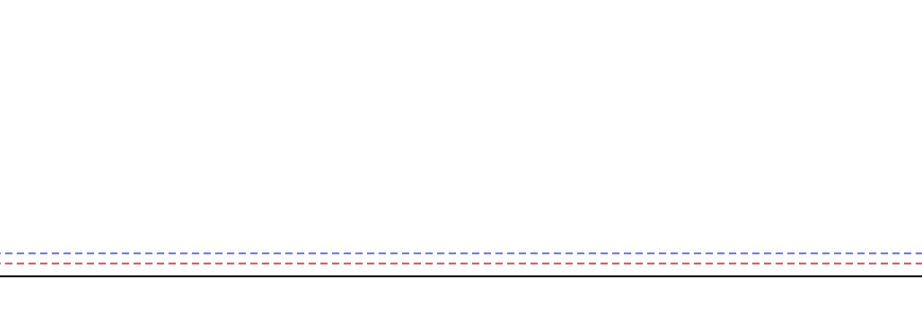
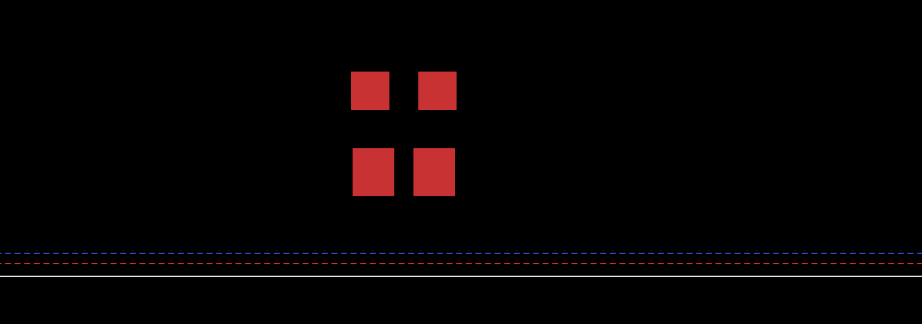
part: none -> (403, 90)
part: none -> (403, 172)

